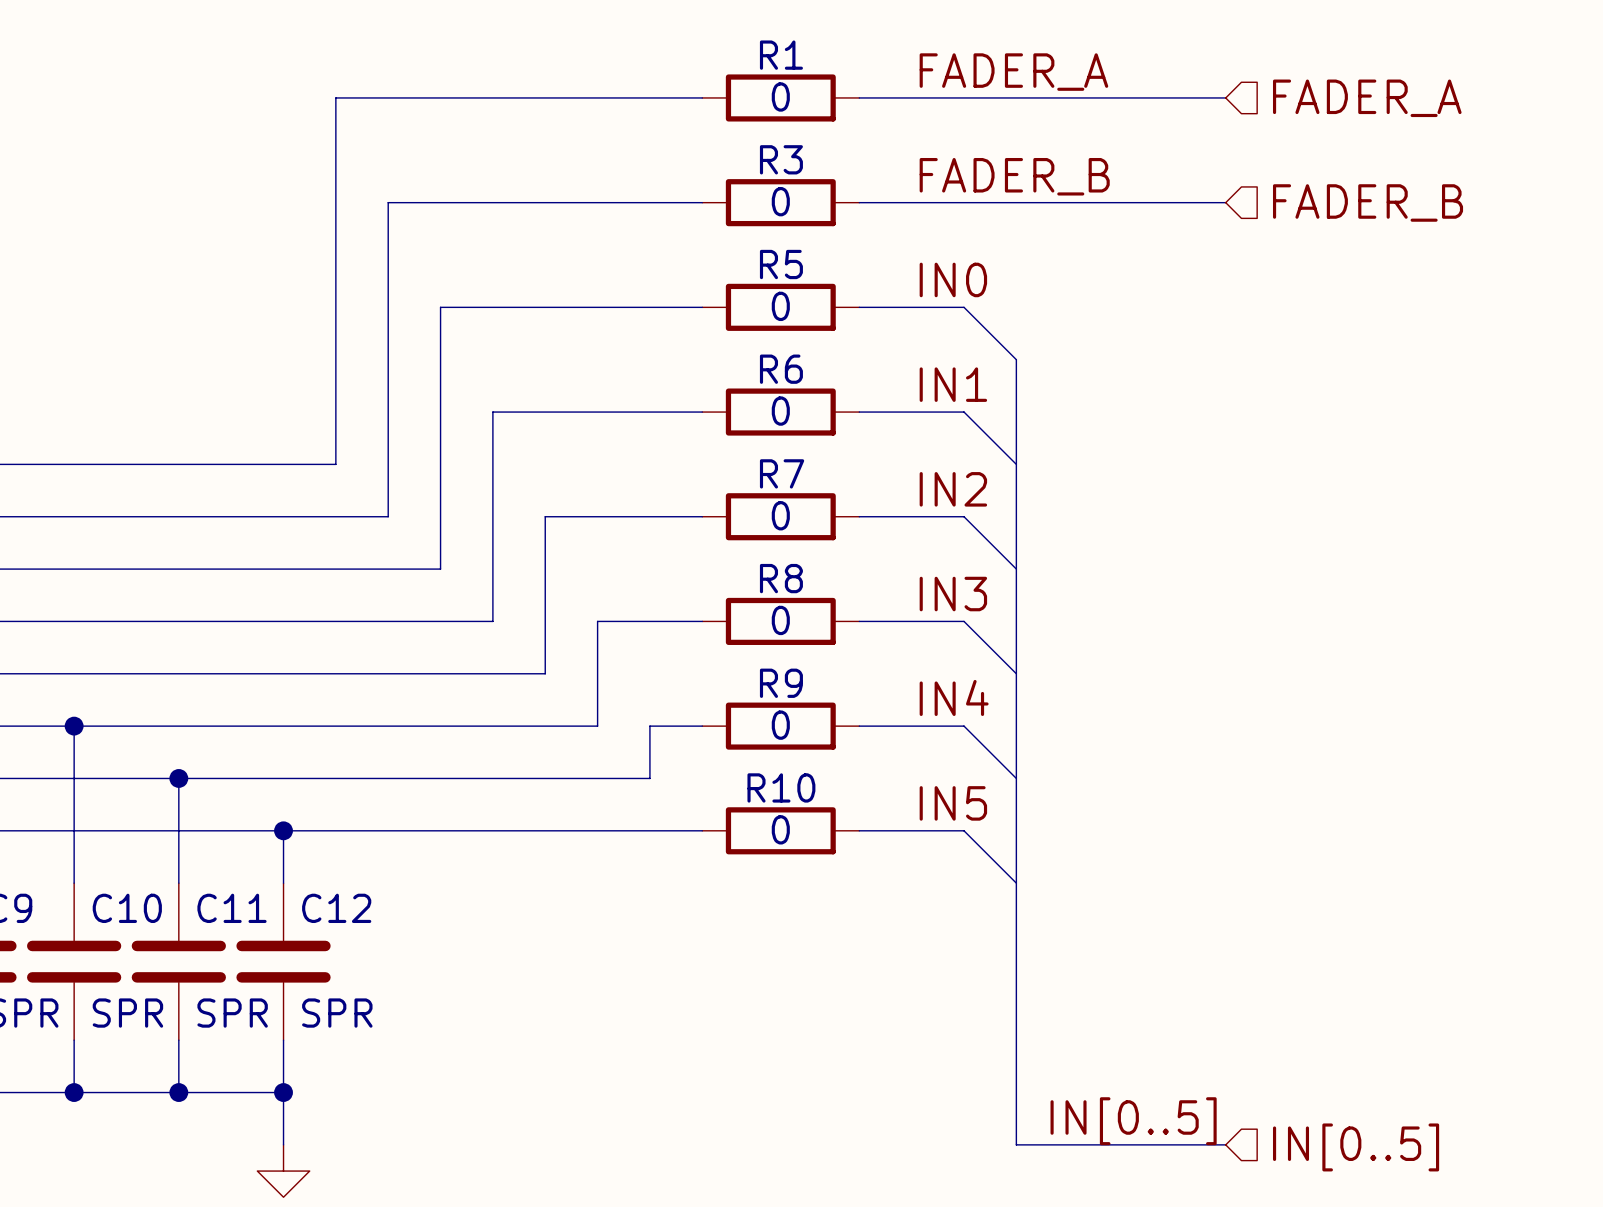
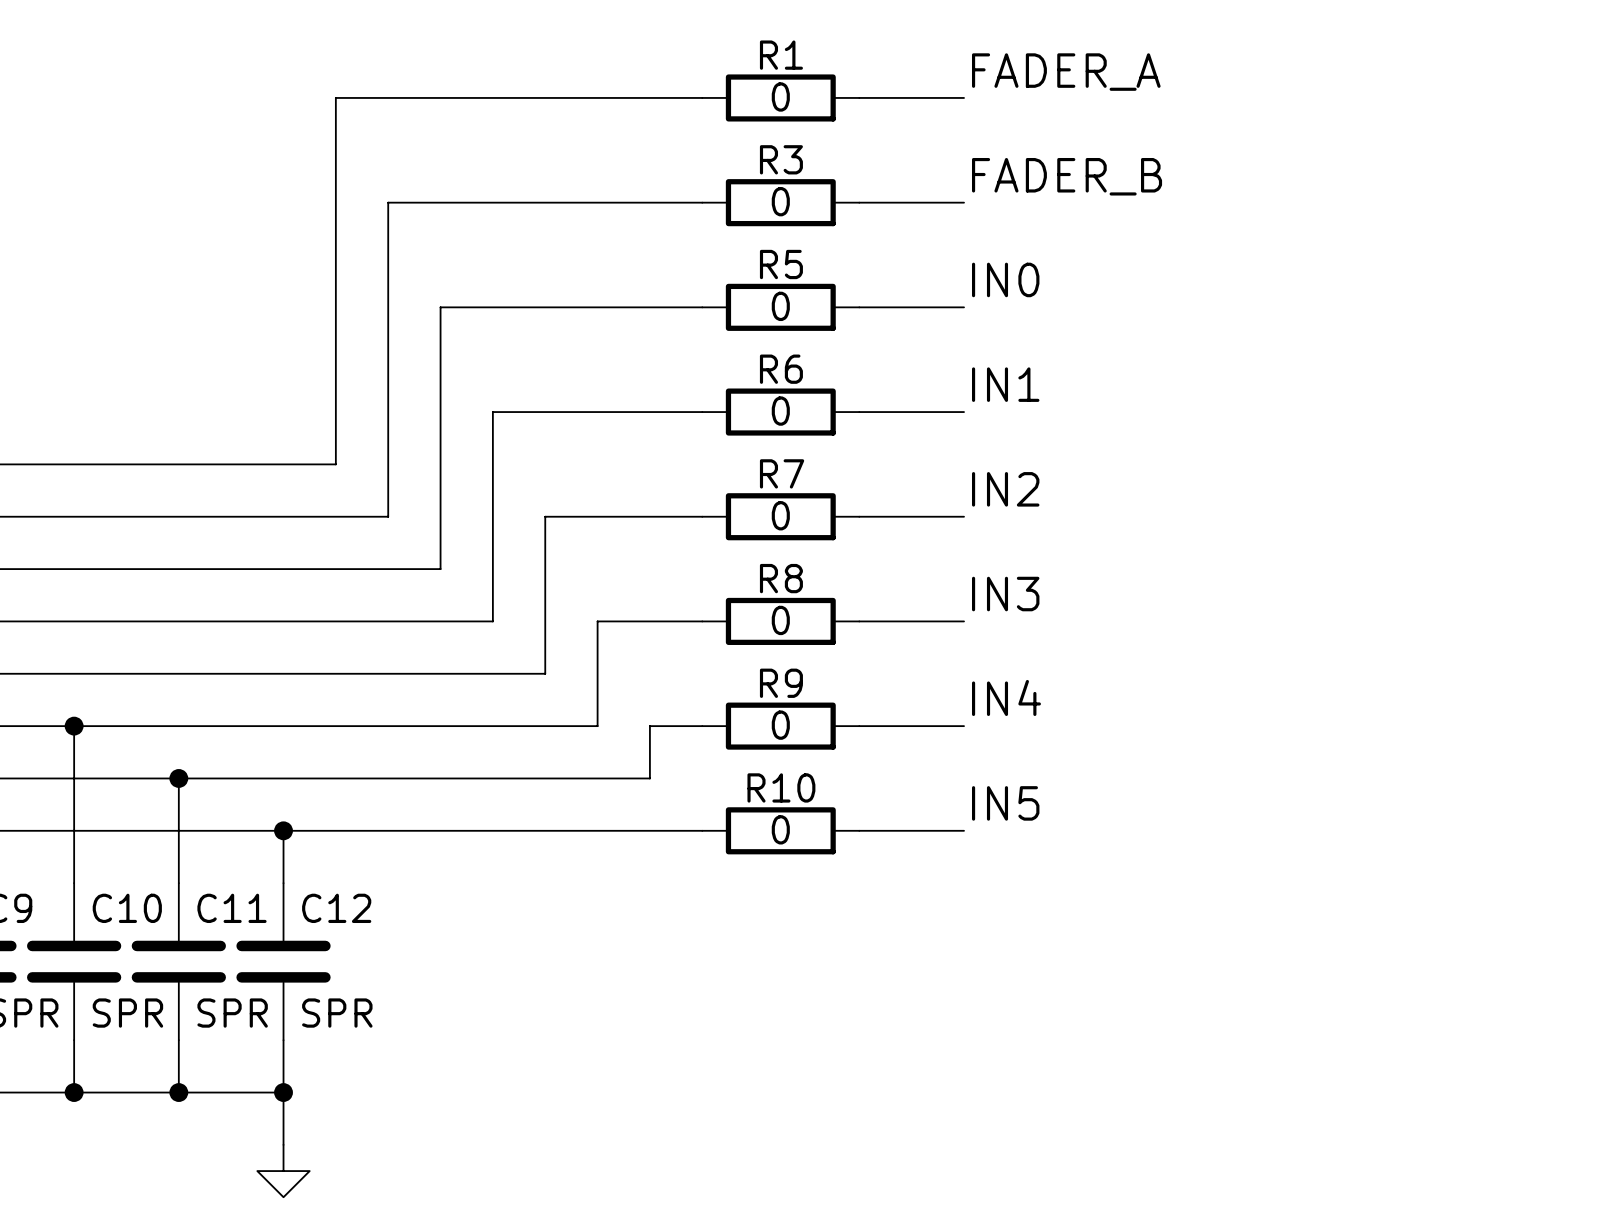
label position: FADER_A (1013, 72) -> FADER_A (1066, 72)
wire: (964, 97) (1225, 97) -> none
hierarchical label: FADER_A (1367, 98) -> none
label position: FADER_B (1014, 176) -> FADER_B (1067, 176)
wire: (964, 202) (1225, 202) -> none
hierarchical label: FADER_B (1368, 202) -> none
label position: IN0 (953, 279) -> IN0 (1005, 279)
wire: (964, 307) (1016, 359) -> none
bus: (1016, 359) (1016, 1144) (1225, 1144) -> none
label position: IN1 (953, 384) -> IN1 (1005, 384)
wire: (964, 412) (1016, 464) -> none
label position: IN2 (953, 489) -> IN2 (1005, 489)
wire: (964, 516) (1016, 569) -> none
label position: IN3 (953, 594) -> IN3 (1005, 594)
wire: (964, 621) (1016, 673) -> none
label position: IN4 (954, 697) -> IN4 (1006, 697)
wire: (964, 726) (1016, 778) -> none
label position: IN5 (953, 803) -> IN5 (1005, 803)
wire: (964, 830) (1016, 883) -> none
label: IN[0..5] (1133, 1121) -> none
hierarchical label: IN[0..5] (1356, 1147) -> none

